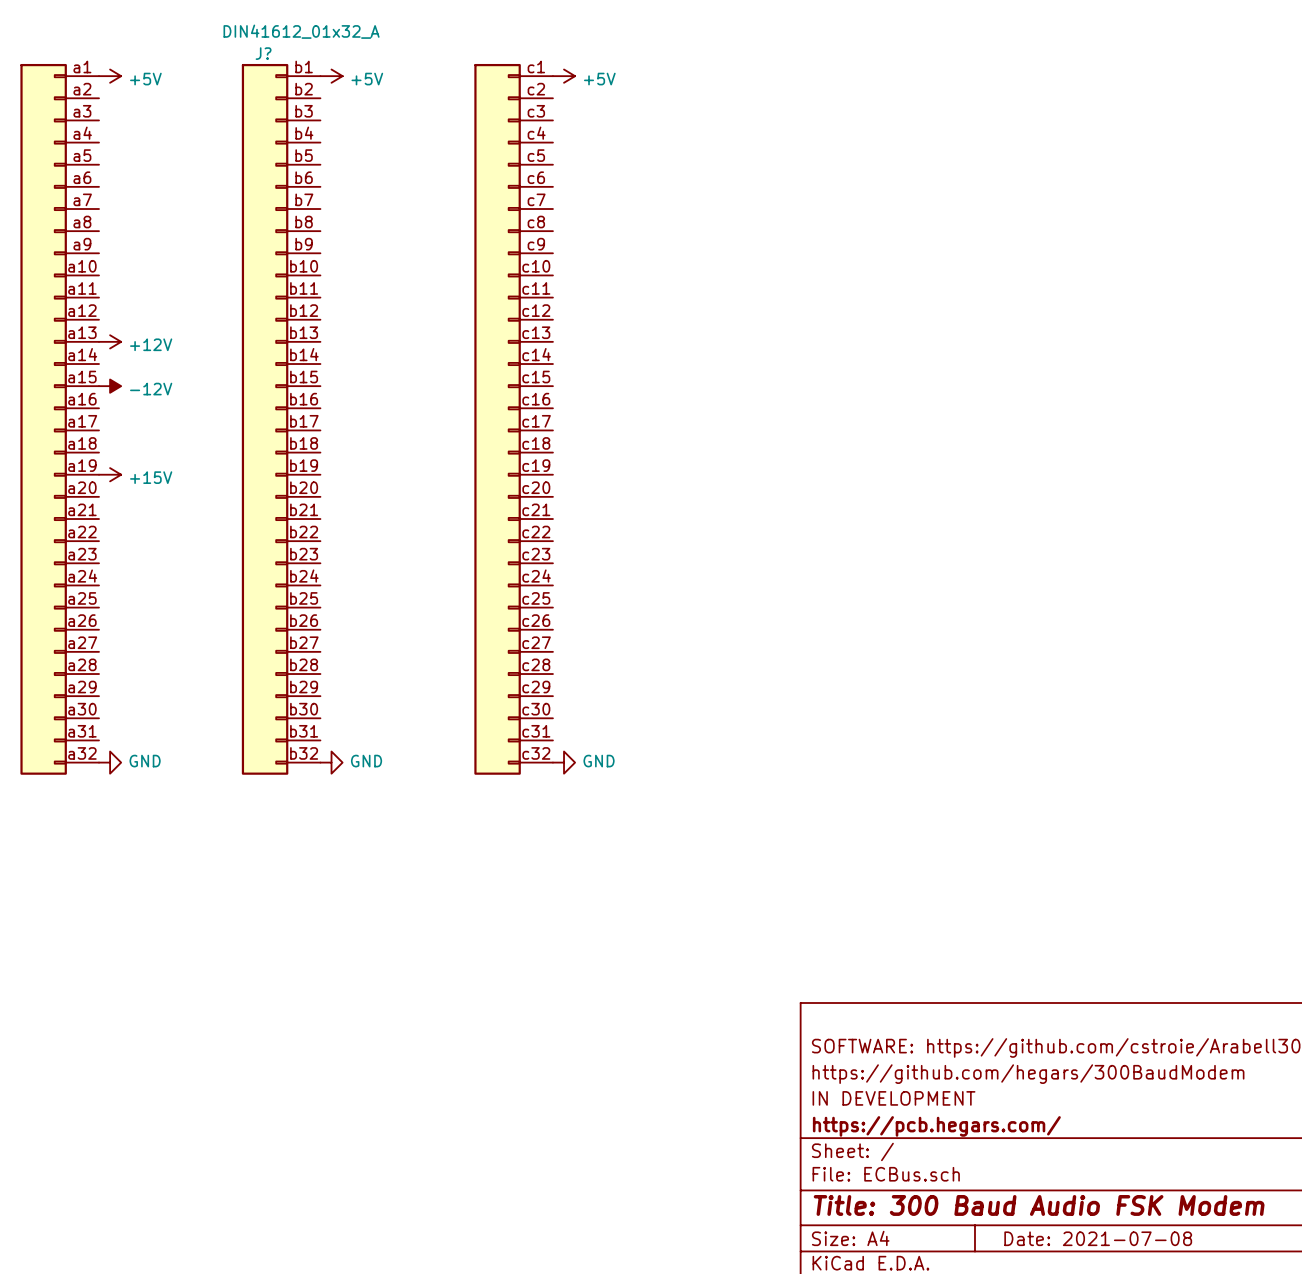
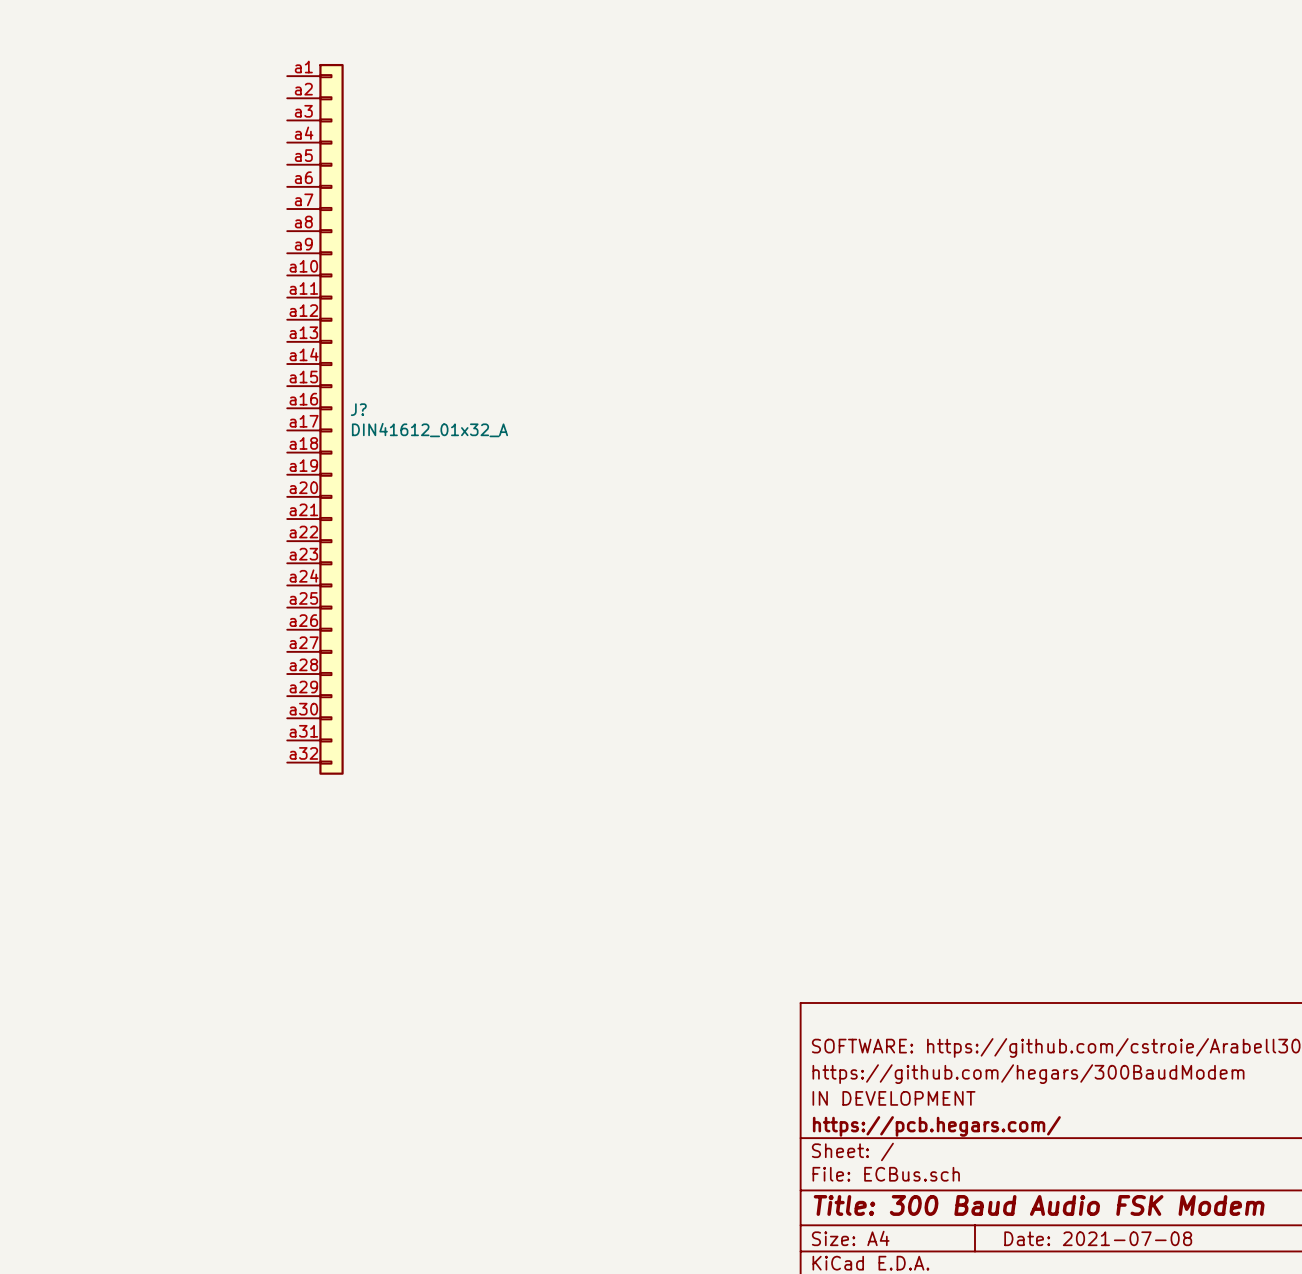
power symbol: +5V (110, 76) -> none
power symbol: +5V (331, 76) -> none
power symbol: +5V (564, 76) -> none
power symbol: +12V (110, 341) -> none
power symbol: -12V (110, 386) -> none
J?: DIN41612_01x32_A (286, 419) -> none
J?: none -> DIN41612_01x32_A (315, 419)
power symbol: +15V (110, 474) -> none
power symbol: GND (110, 762) -> none
power symbol: GND (331, 762) -> none
power symbol: GND (564, 762) -> none

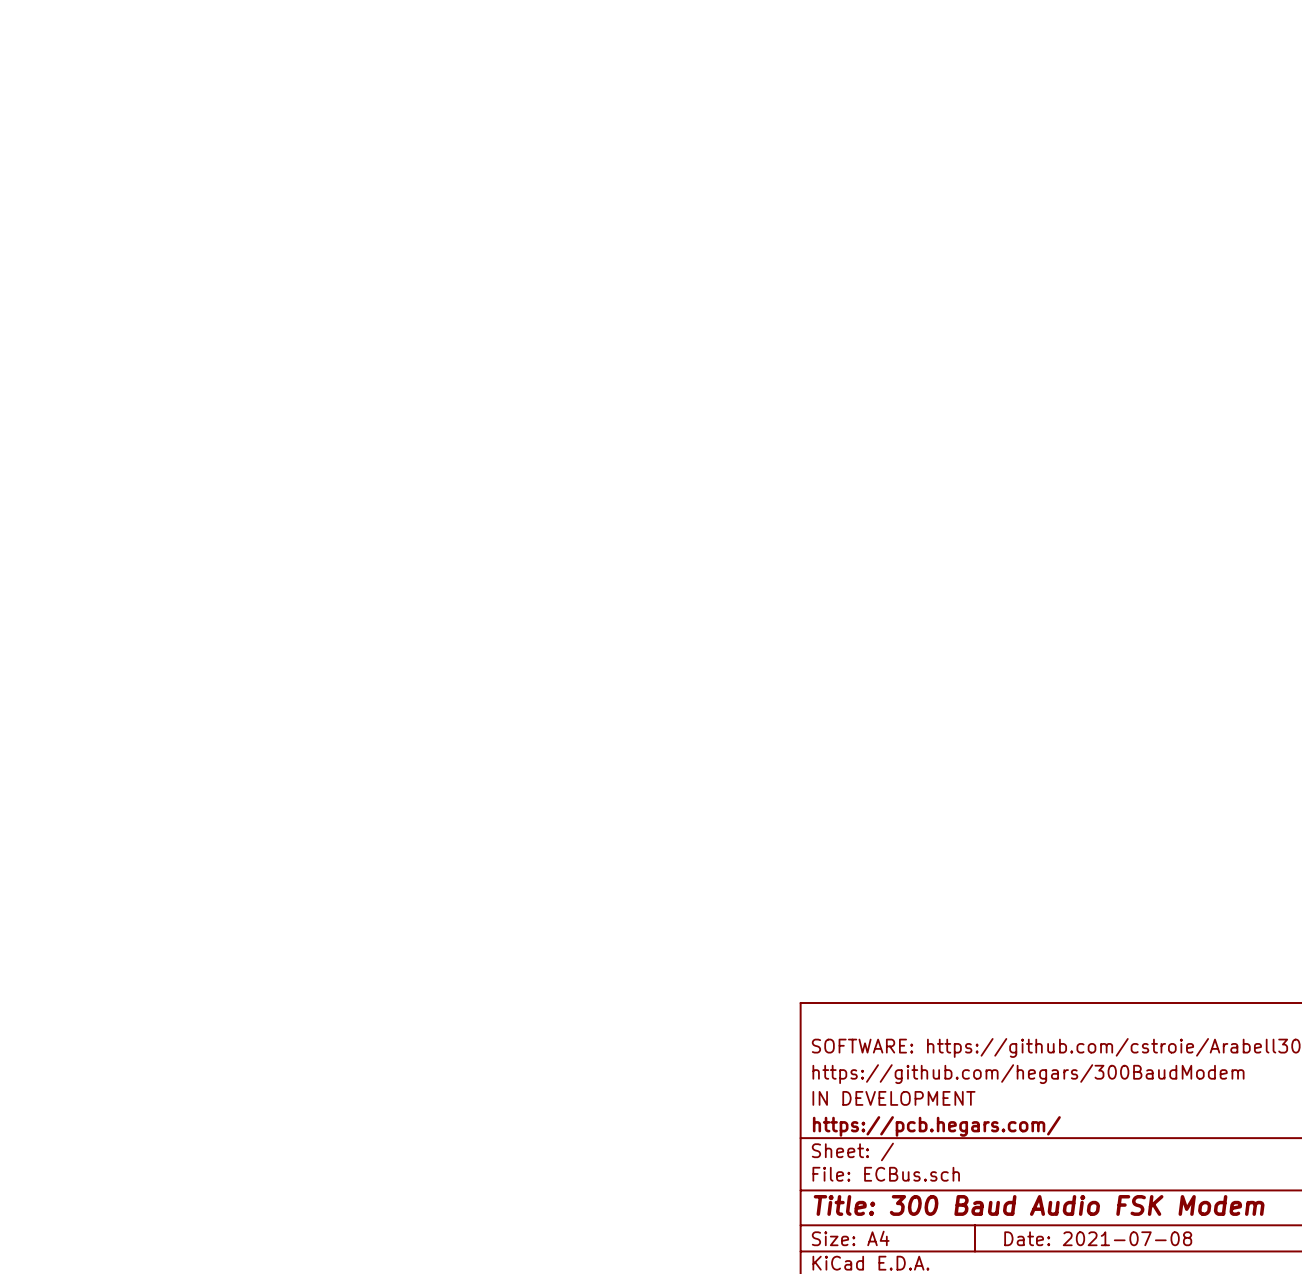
J?: DIN41612_01x32_A (315, 419) -> none

